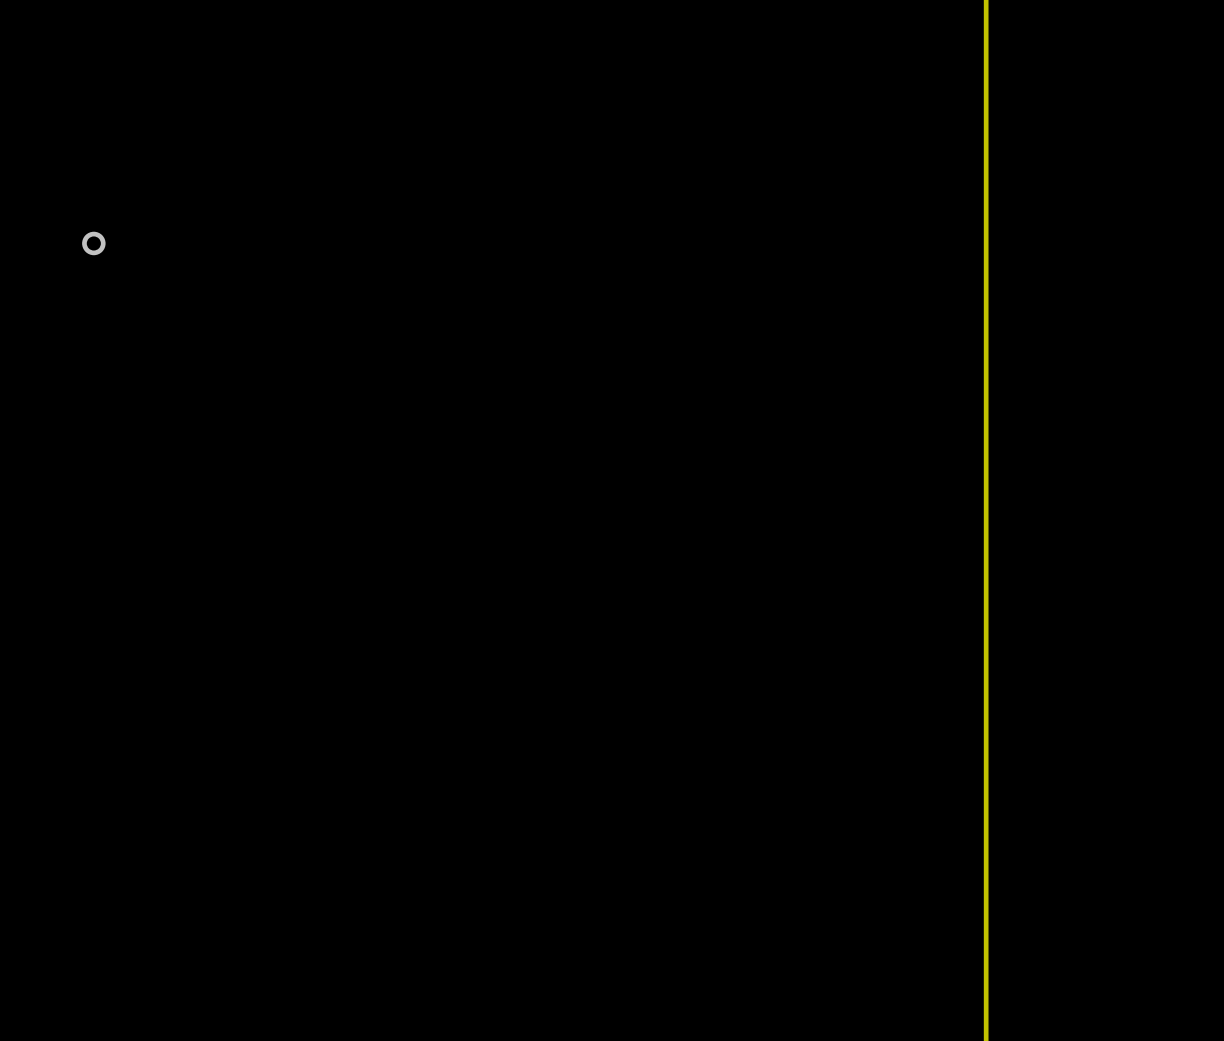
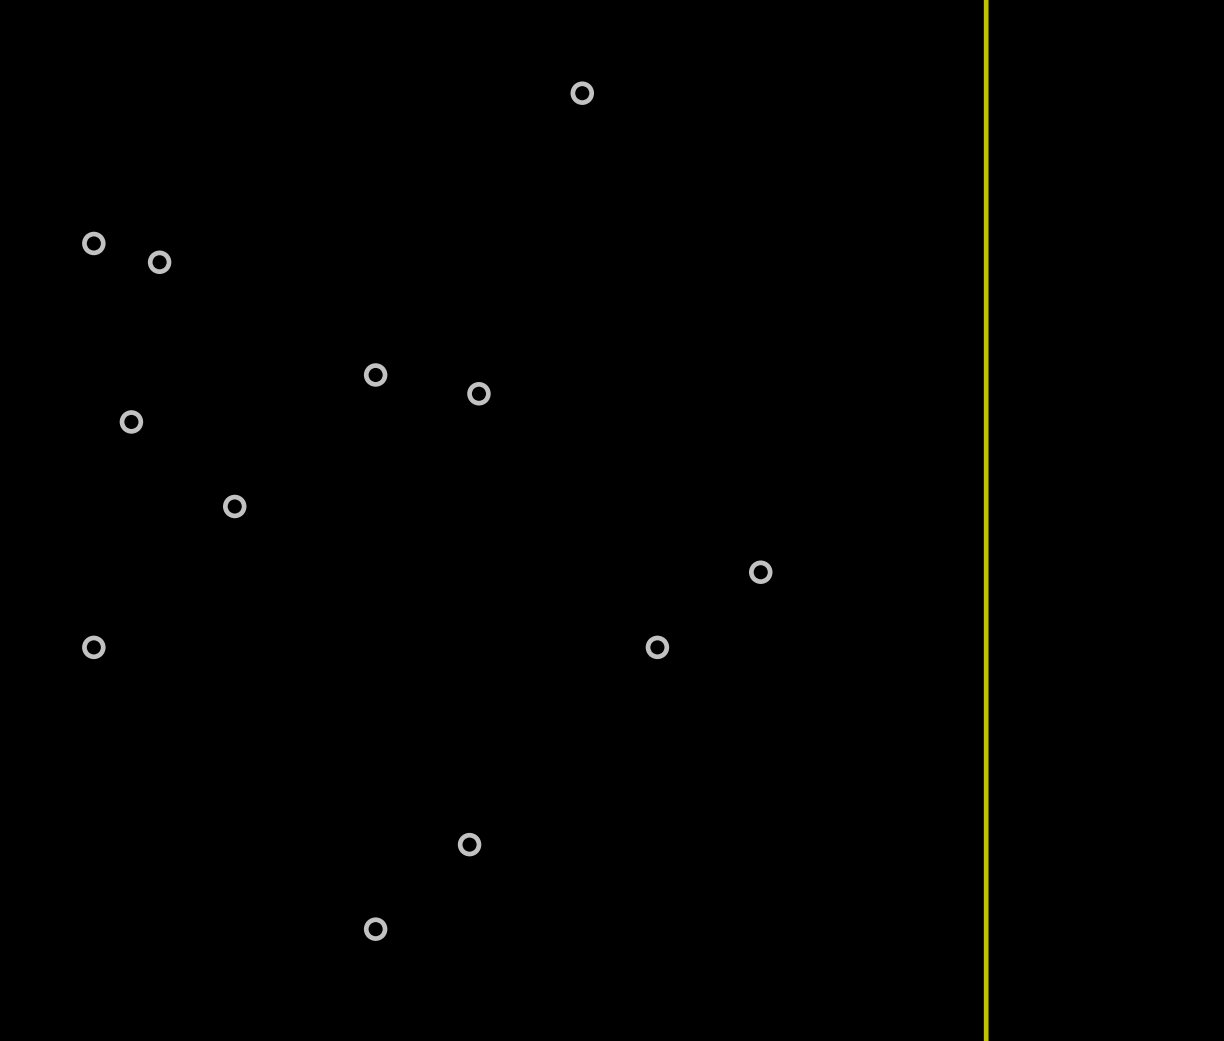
via: none -> (582, 93)
via: none -> (159, 262)
via: none -> (375, 374)
via: none -> (478, 393)
via: none -> (131, 421)
via: none -> (234, 506)
via: none -> (760, 572)
via: none -> (93, 647)
via: none -> (657, 647)
via: none -> (469, 844)
via: none -> (375, 929)

